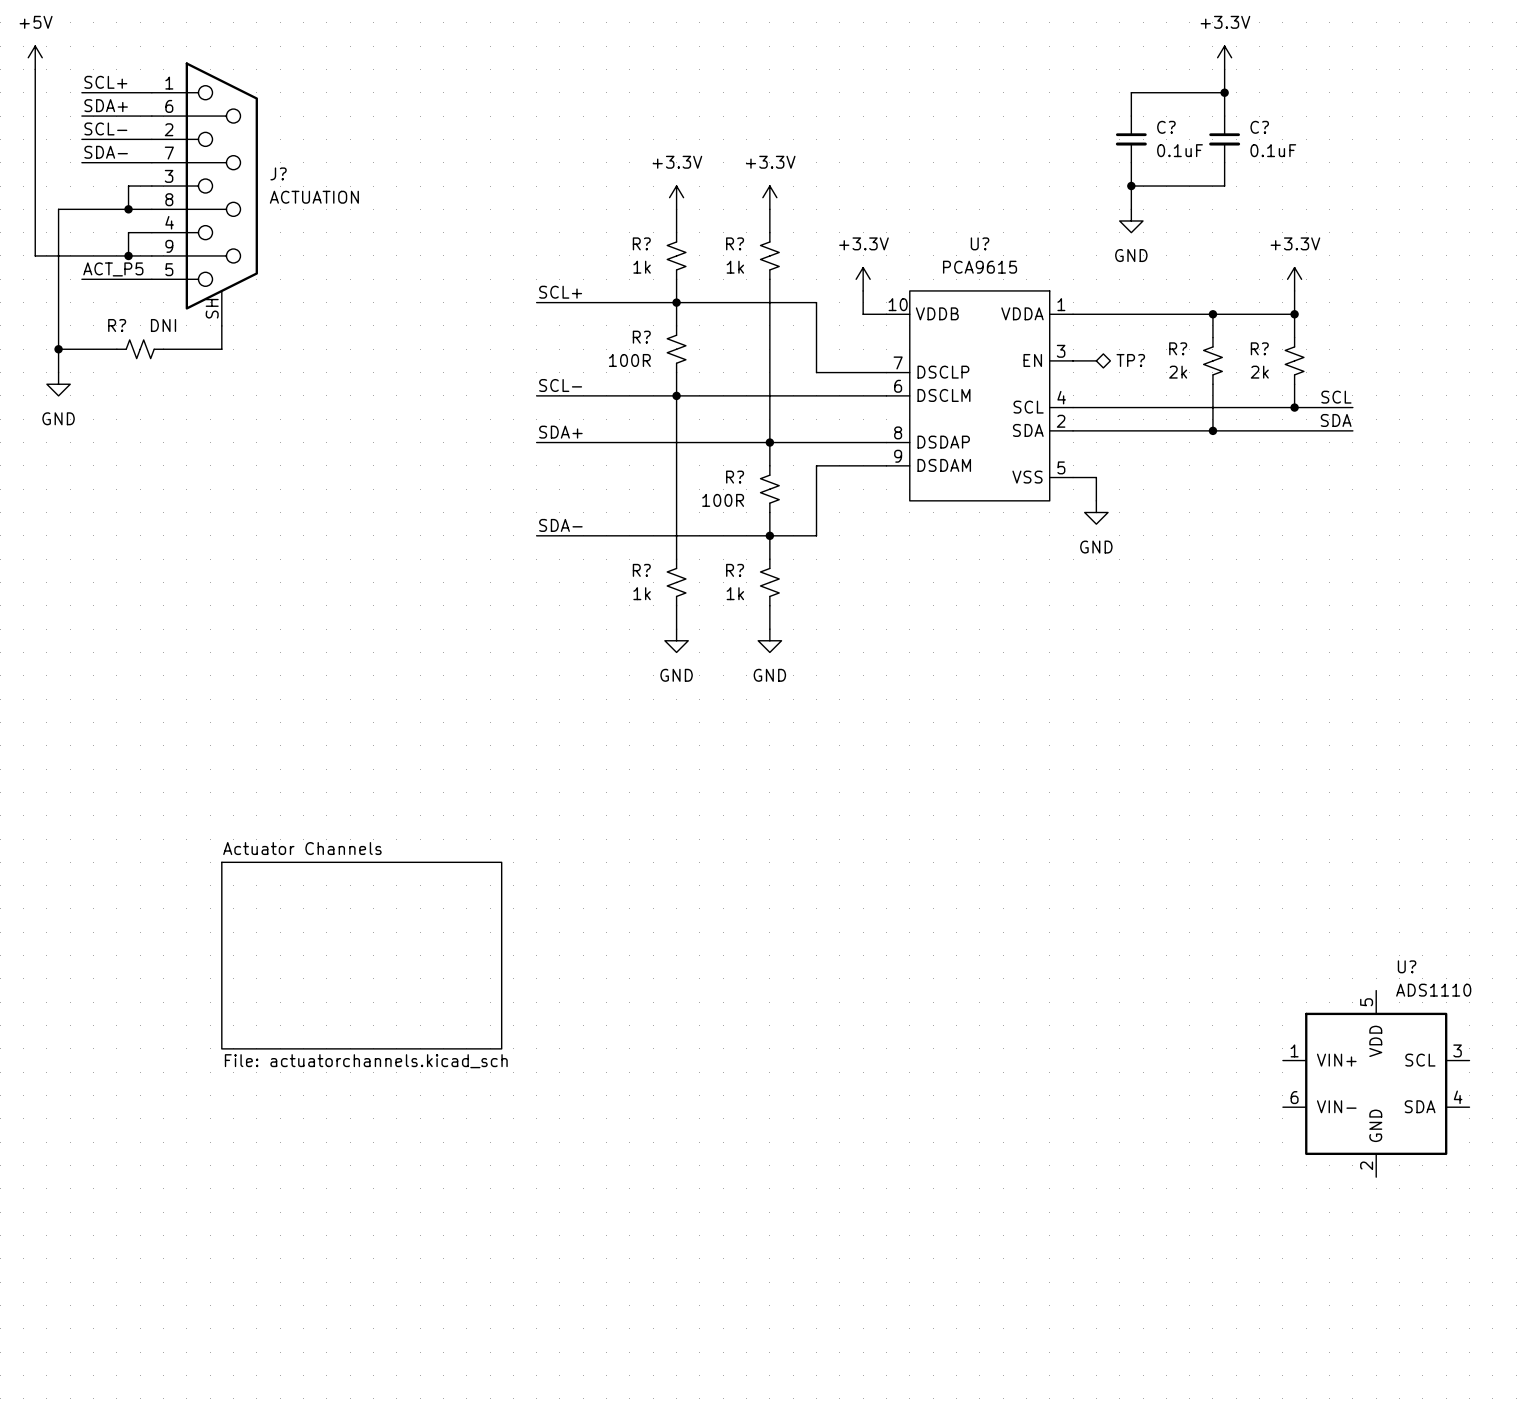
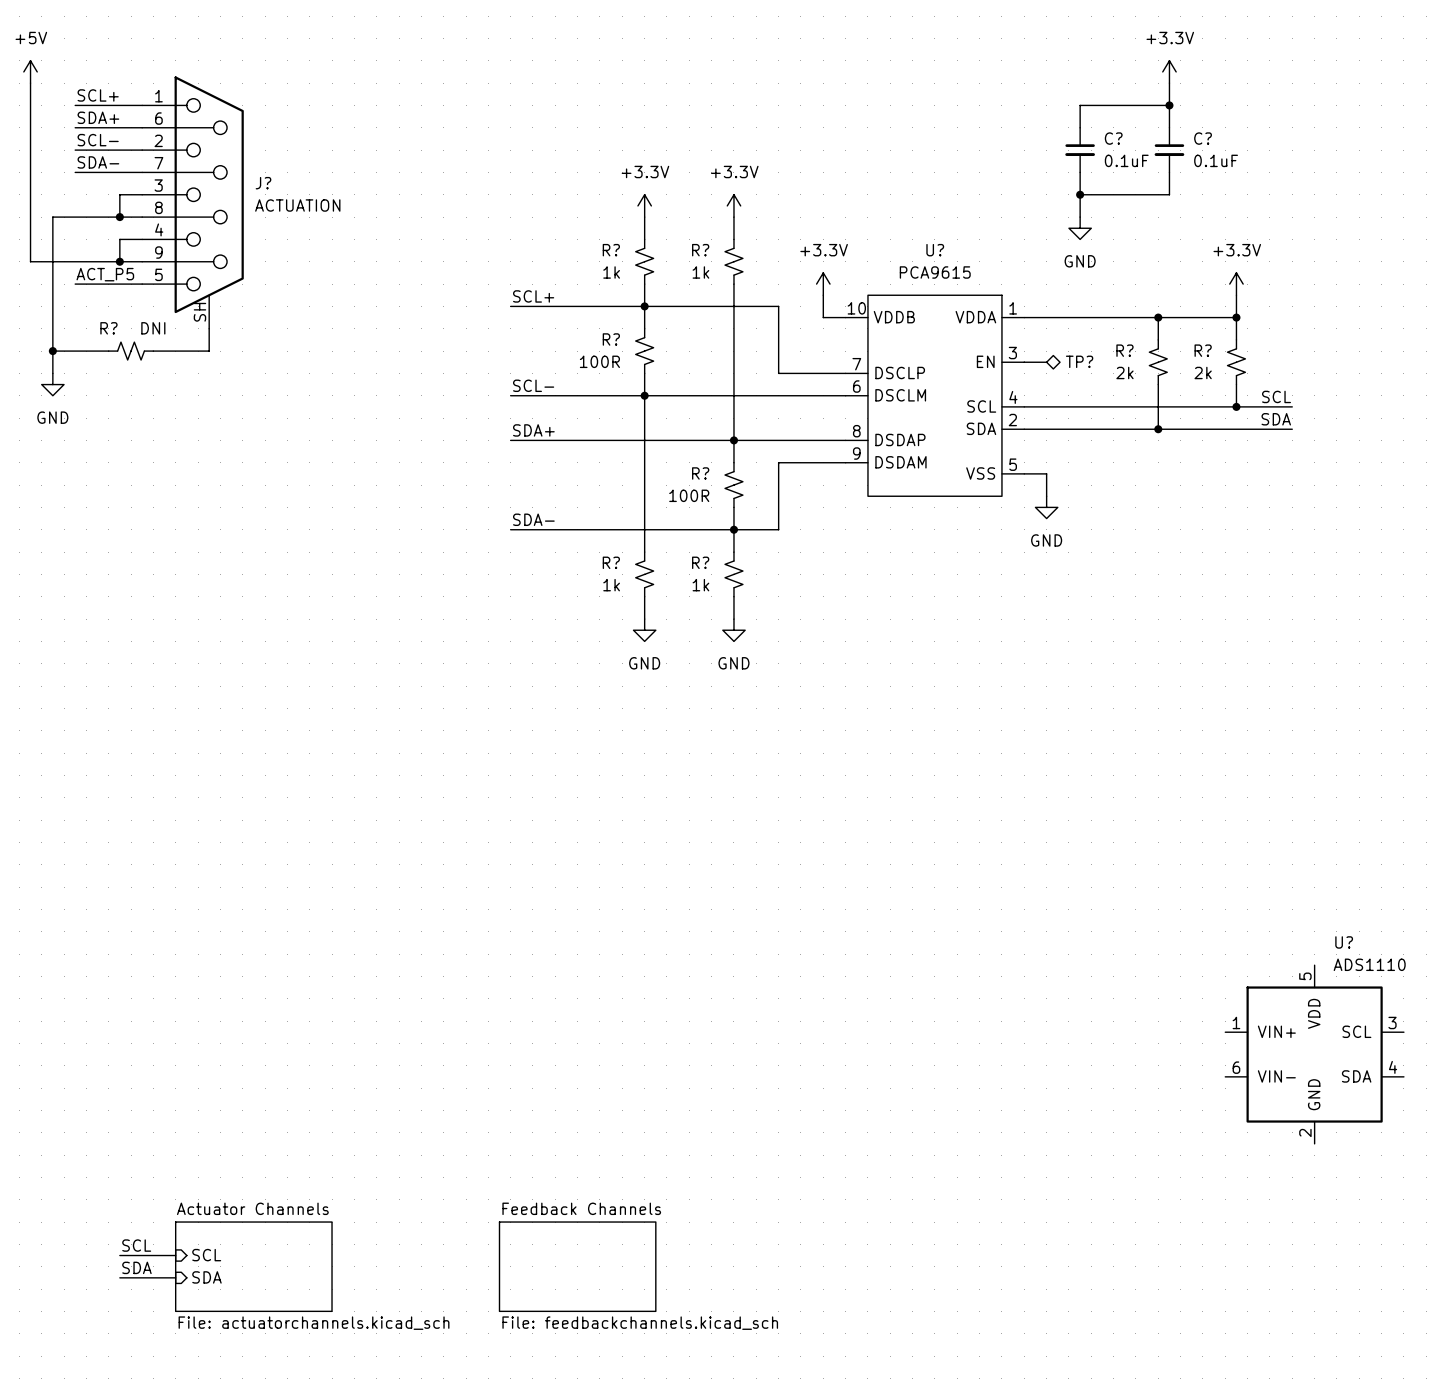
sheet Actuator Channels: File: actuatorchannels.kicad_sch (361, 955) -> none
label: none -> SCL (136, 1245)
wire: none -> (119, 1255) (175, 1255)
sheet pin: none -> SCL (206, 1255)
sheet Actuator Channels: none -> File: actuatorchannels.kicad_sch (253, 1266)
sheet Feedback Channels: none -> File: feedbackchannels.kicad_sch (577, 1266)
label: none -> SDA (136, 1267)
sheet pin: none -> SDA (206, 1277)
wire: none -> (119, 1277) (175, 1277)

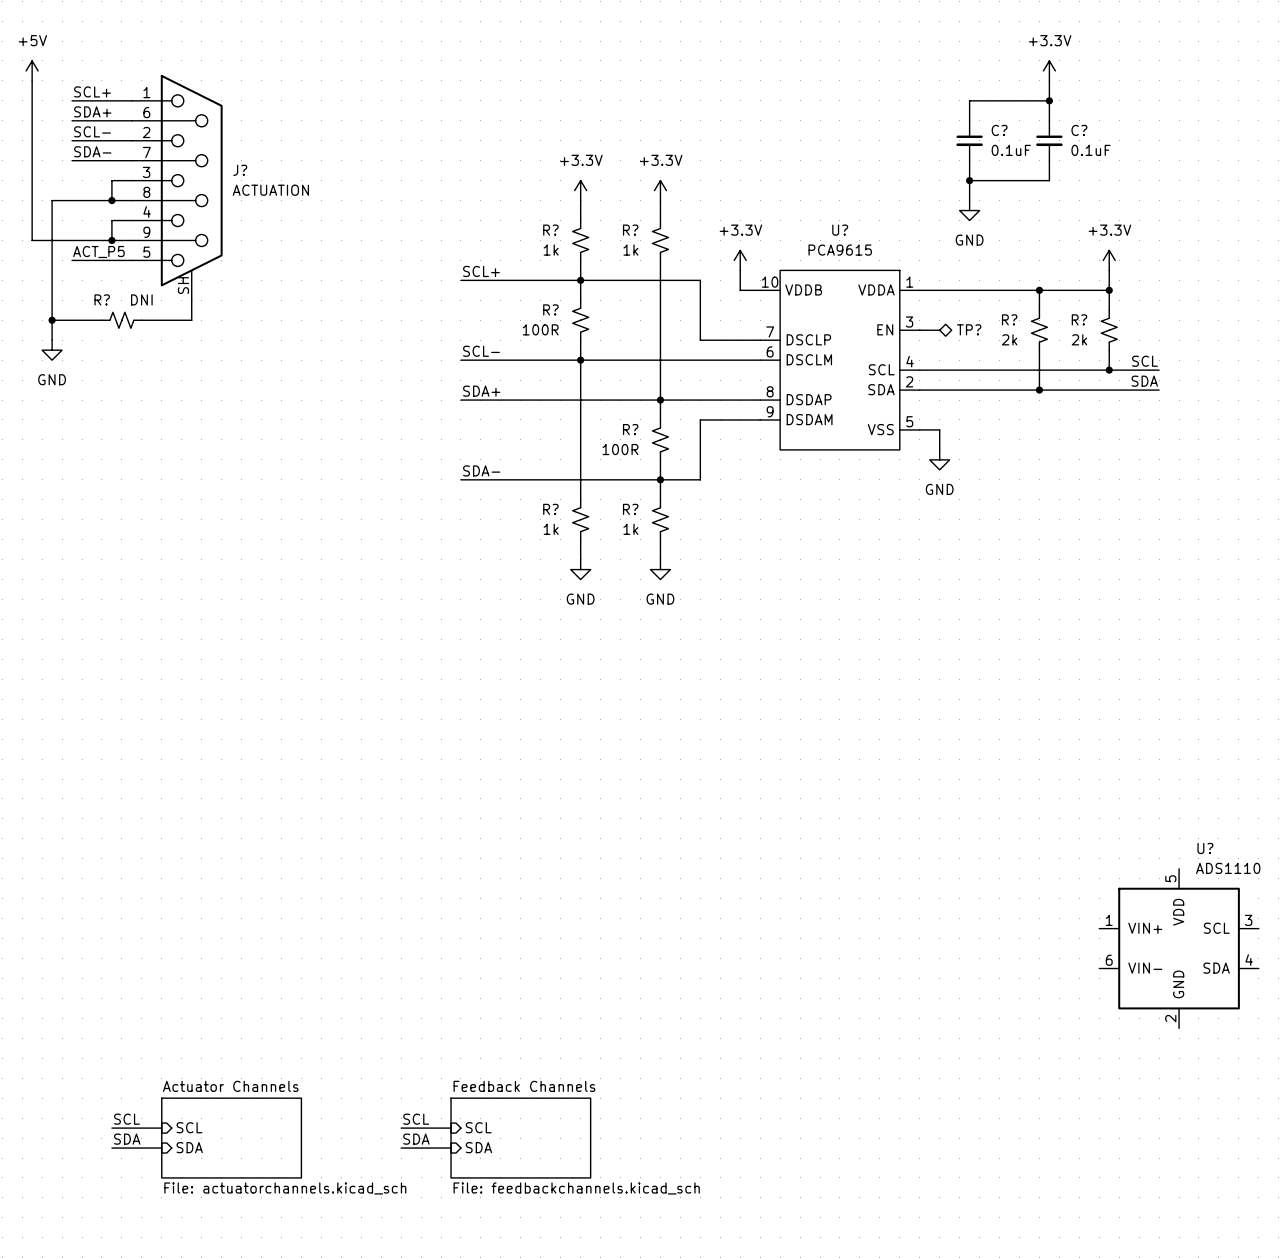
label: none -> SCL (416, 1119)
wire: none -> (401, 1128) (451, 1128)
sheet pin: none -> SCL (478, 1127)
label: none -> SDA (416, 1139)
wire: none -> (401, 1148) (451, 1148)
sheet pin: none -> SDA (478, 1147)

